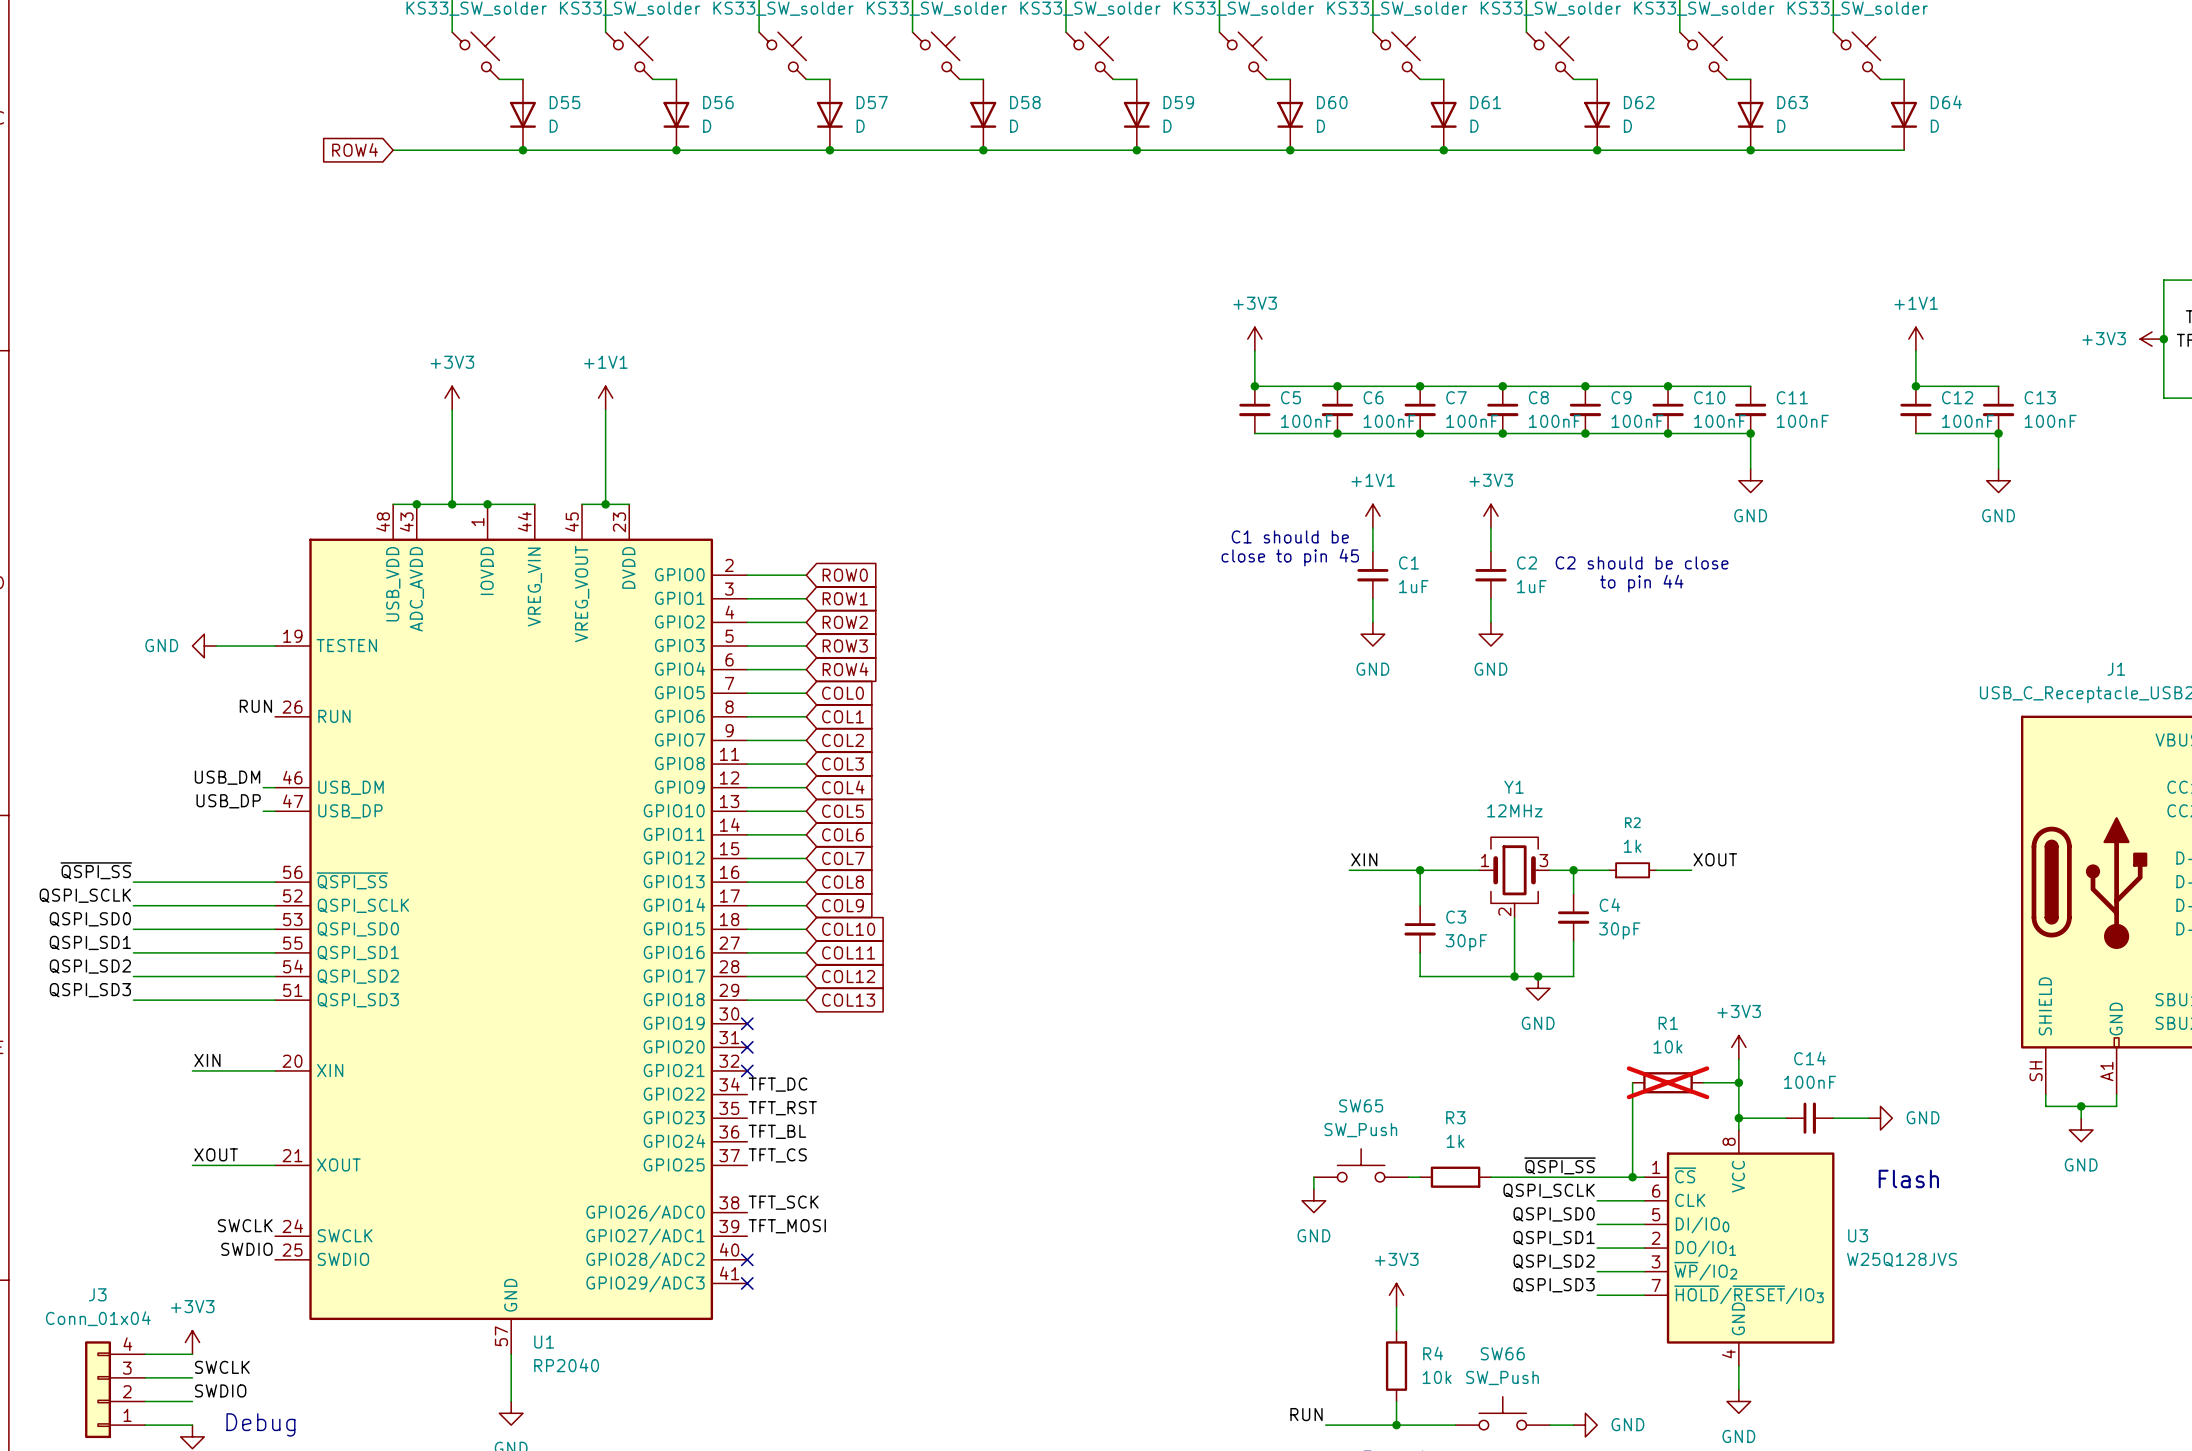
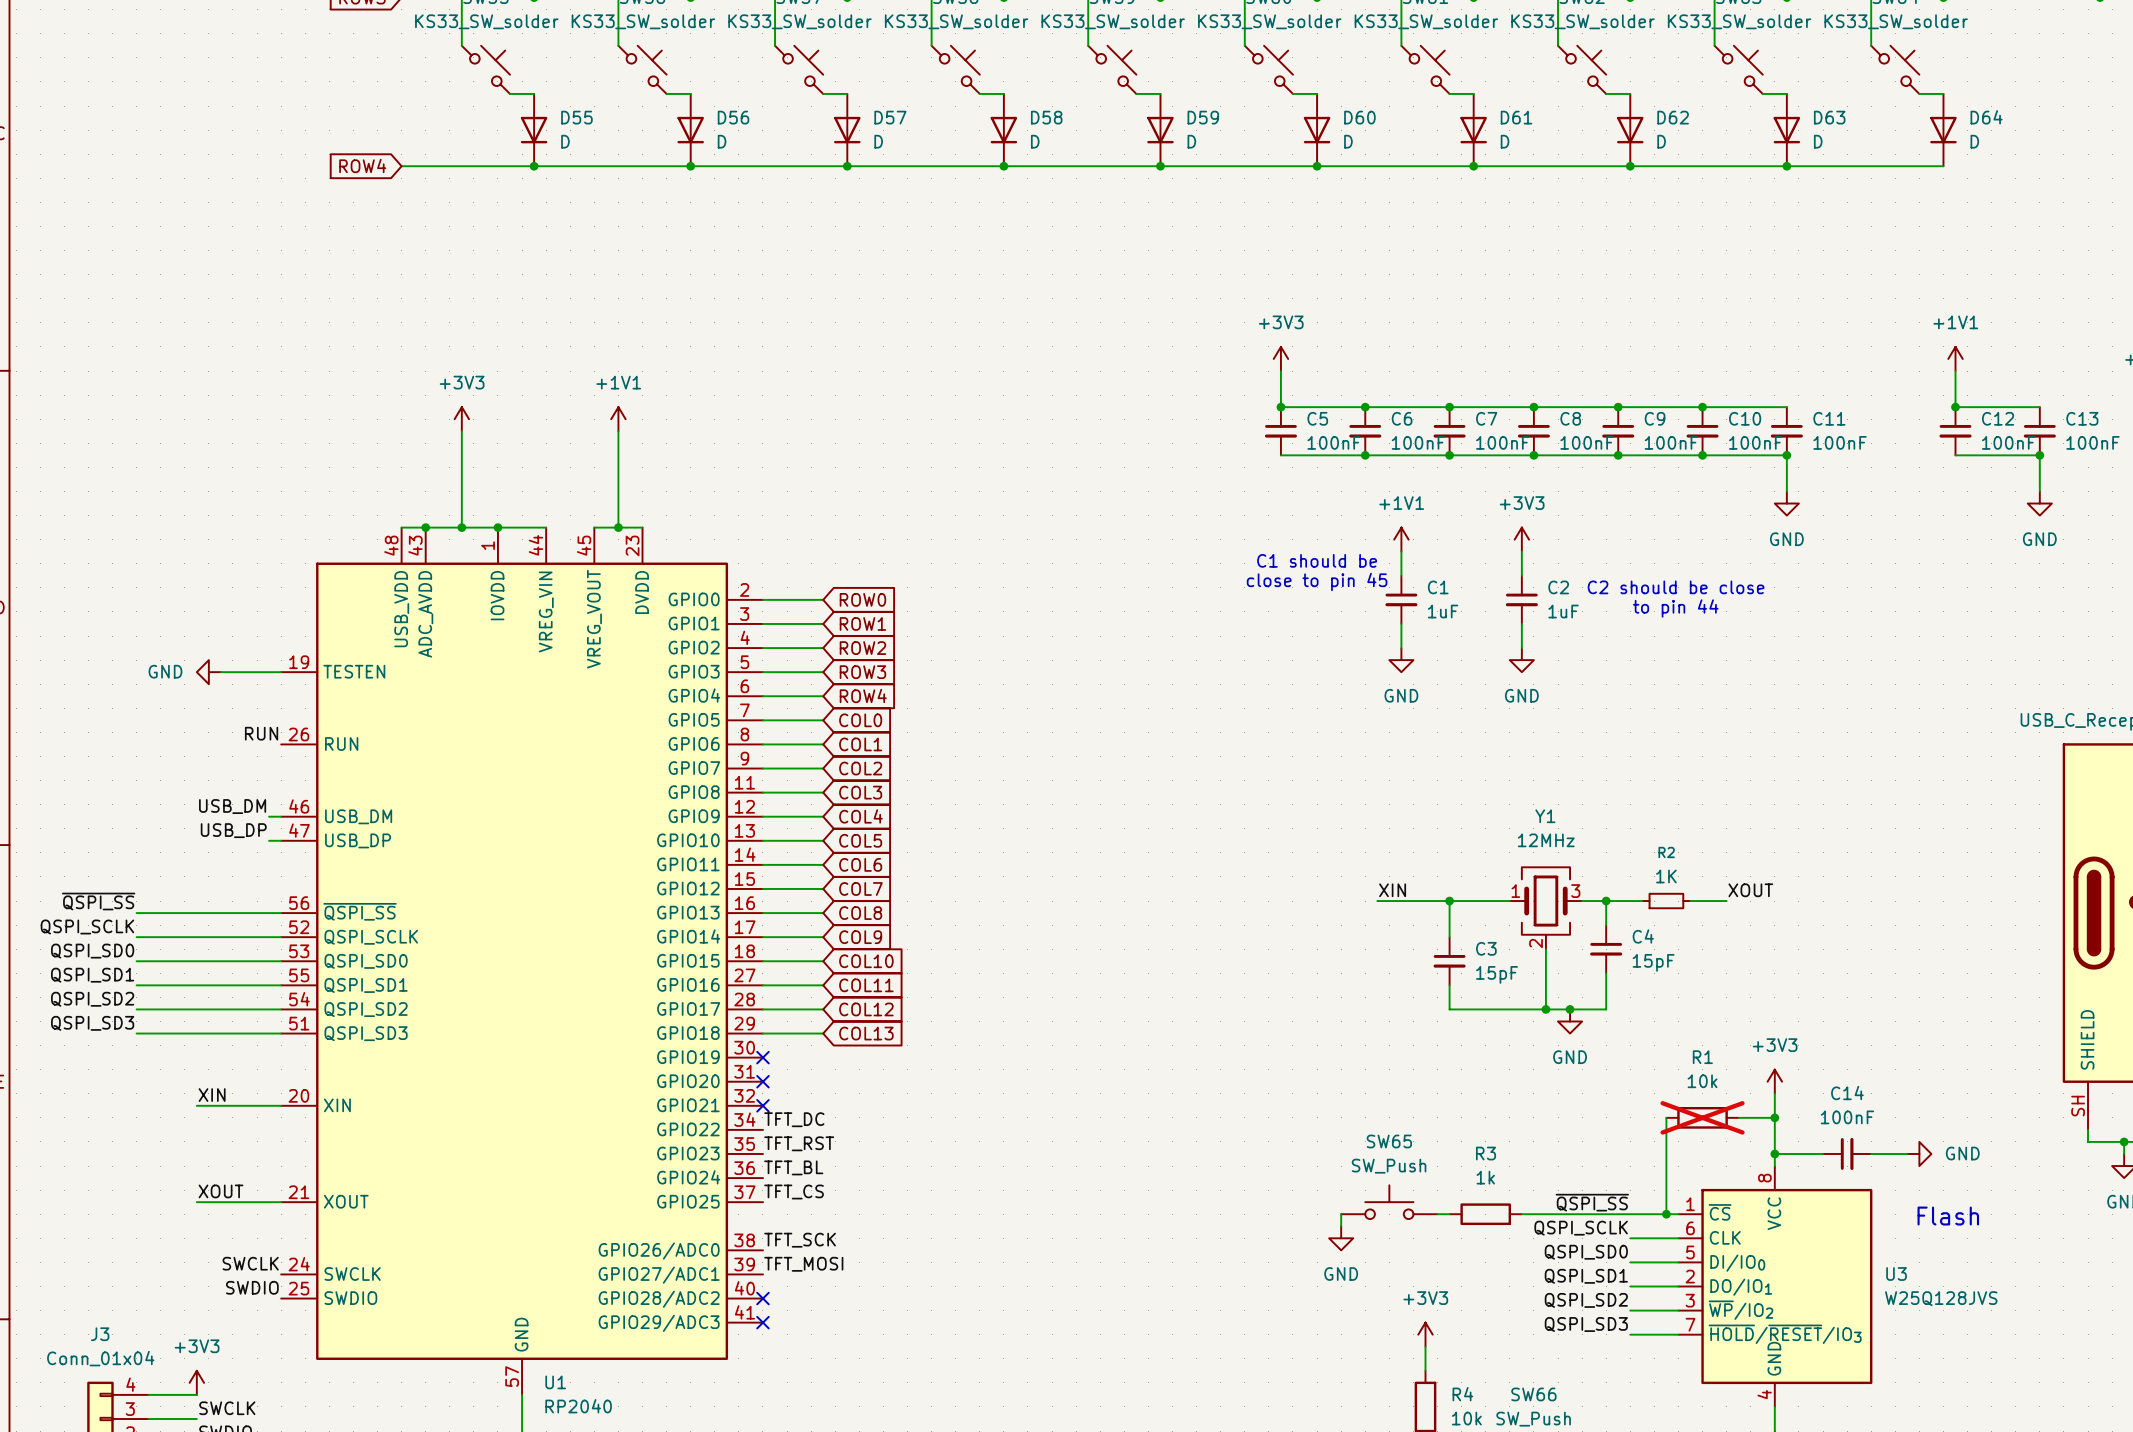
R2 value: 1k (1632, 846) -> 1K (1666, 876)
C4 value: 30pF (1619, 930) -> 15pF (1653, 962)
C3 value: 30pF (1466, 942) -> 15pF (1497, 974)

